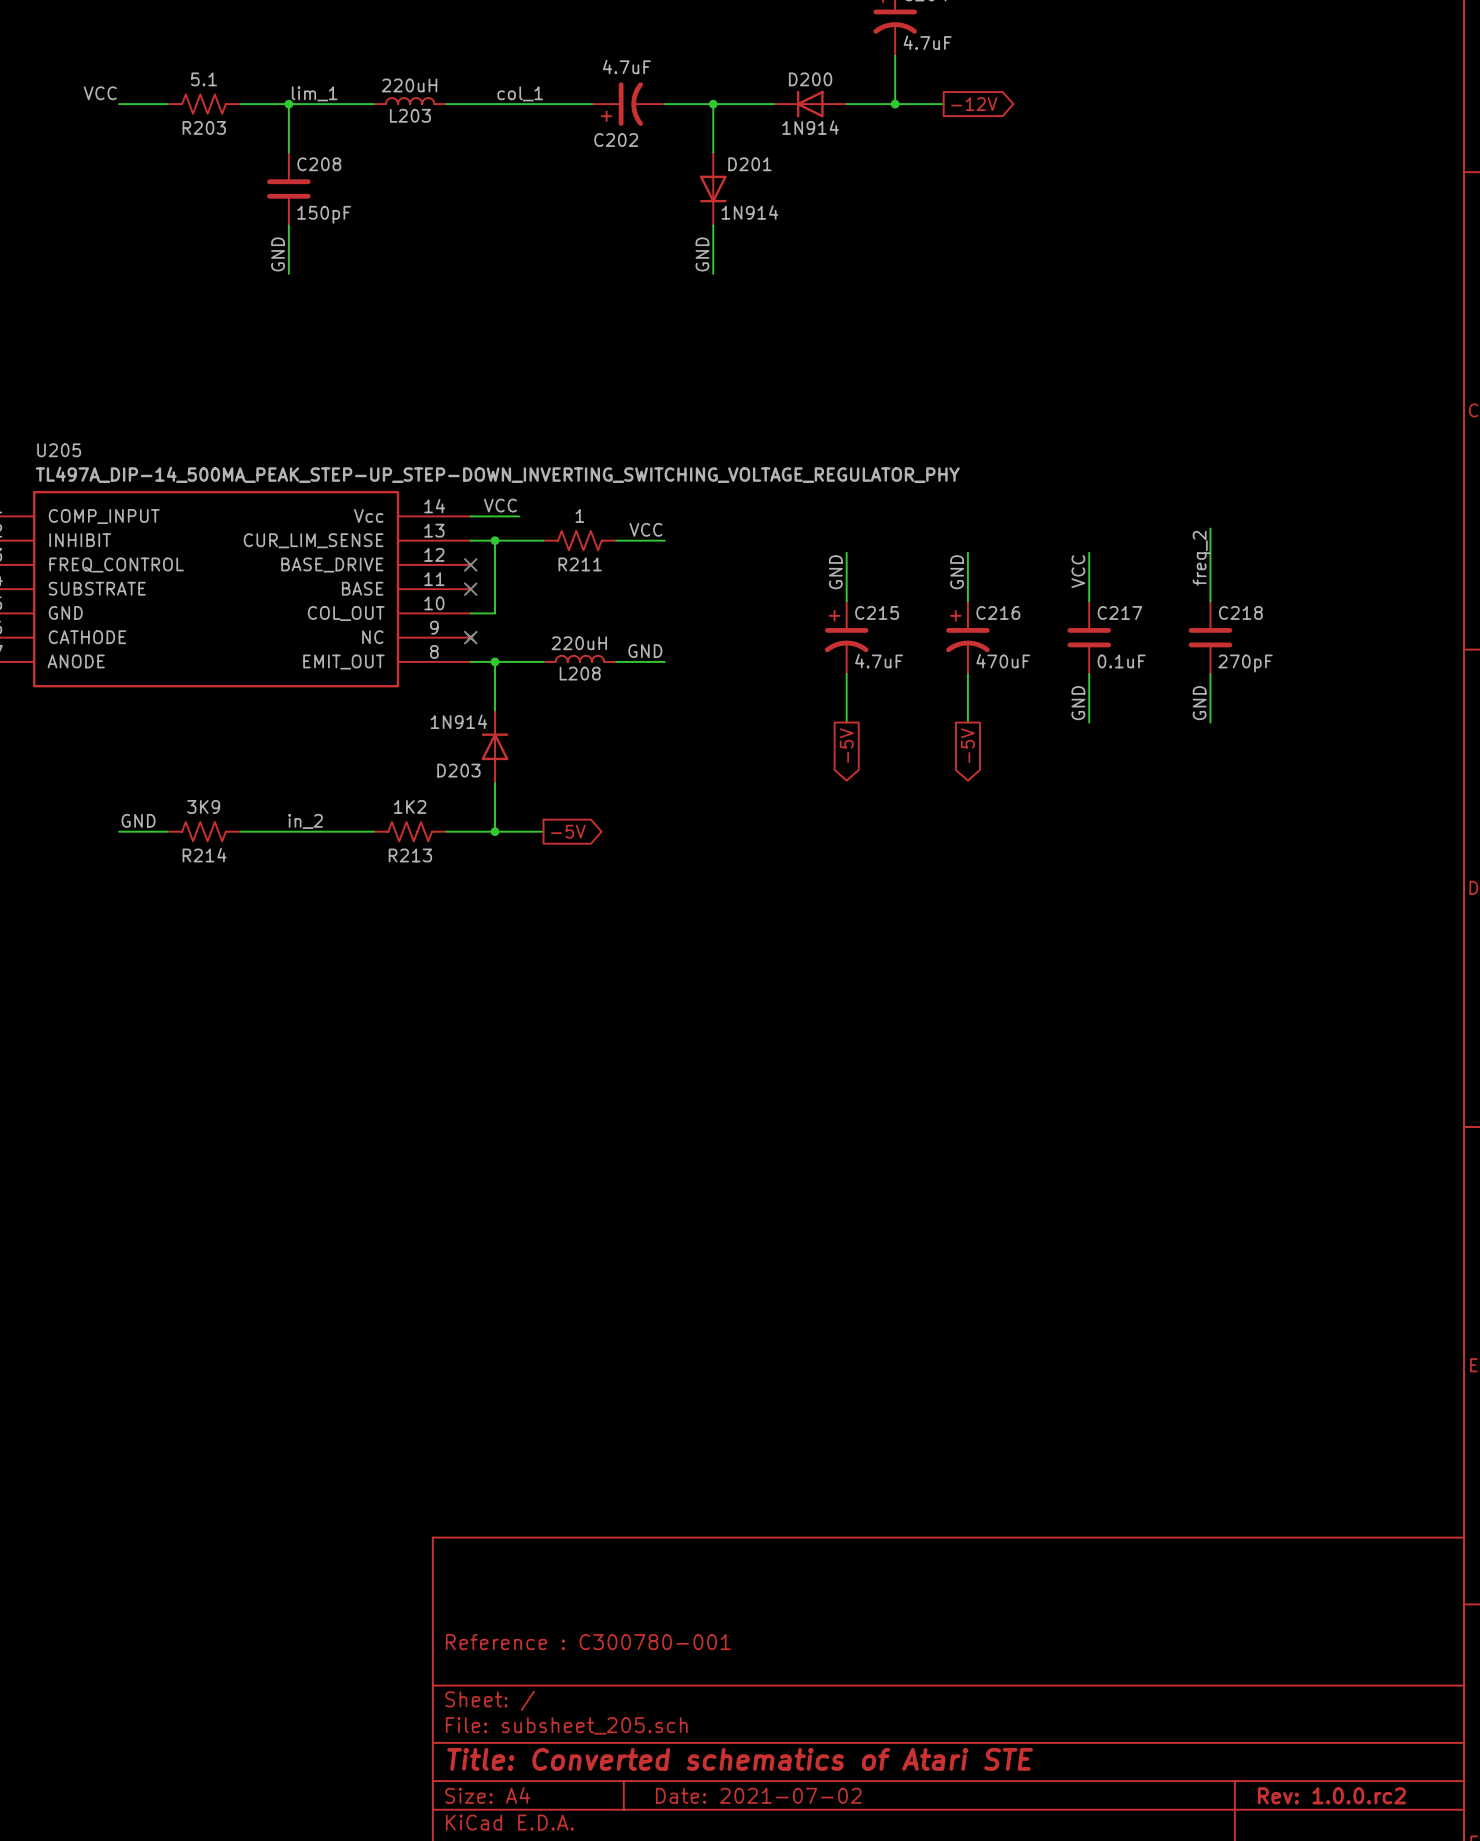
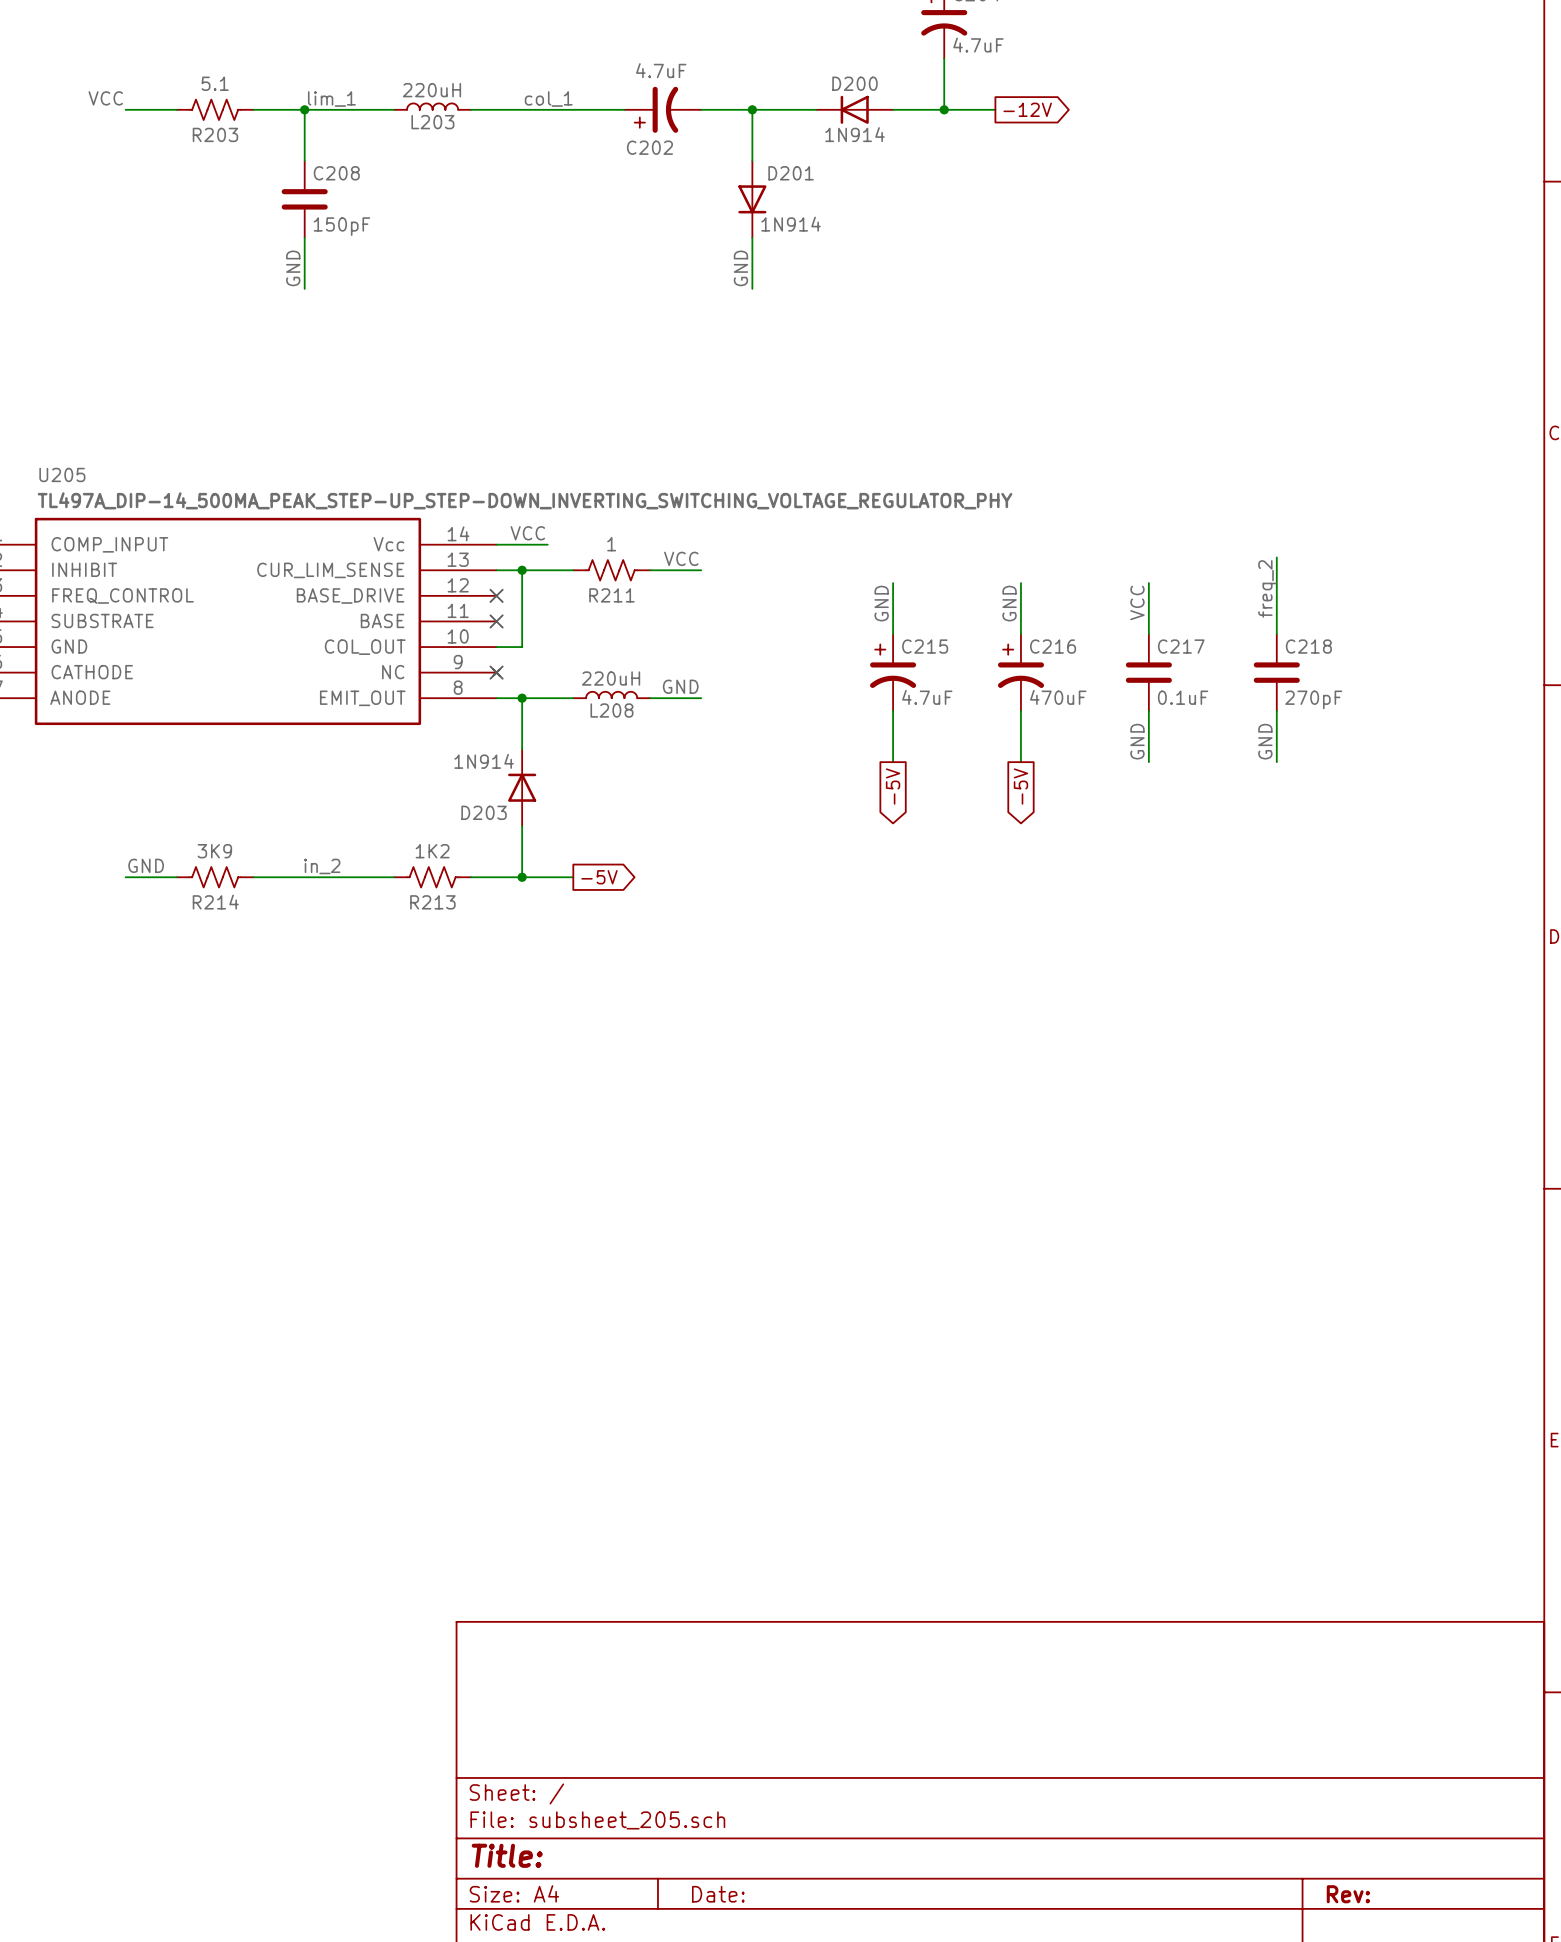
title block: Reference : C300780-001 (588, 1642) -> none
title block: Title: Converted schematics of Atari STE (740, 1759) -> Title: (507, 1855)
title block: Date: 2021-07-02 (758, 1795) -> Date: (718, 1894)
title block: Rev: 1.0.0.rc2 (1331, 1795) -> Rev: (1348, 1894)

